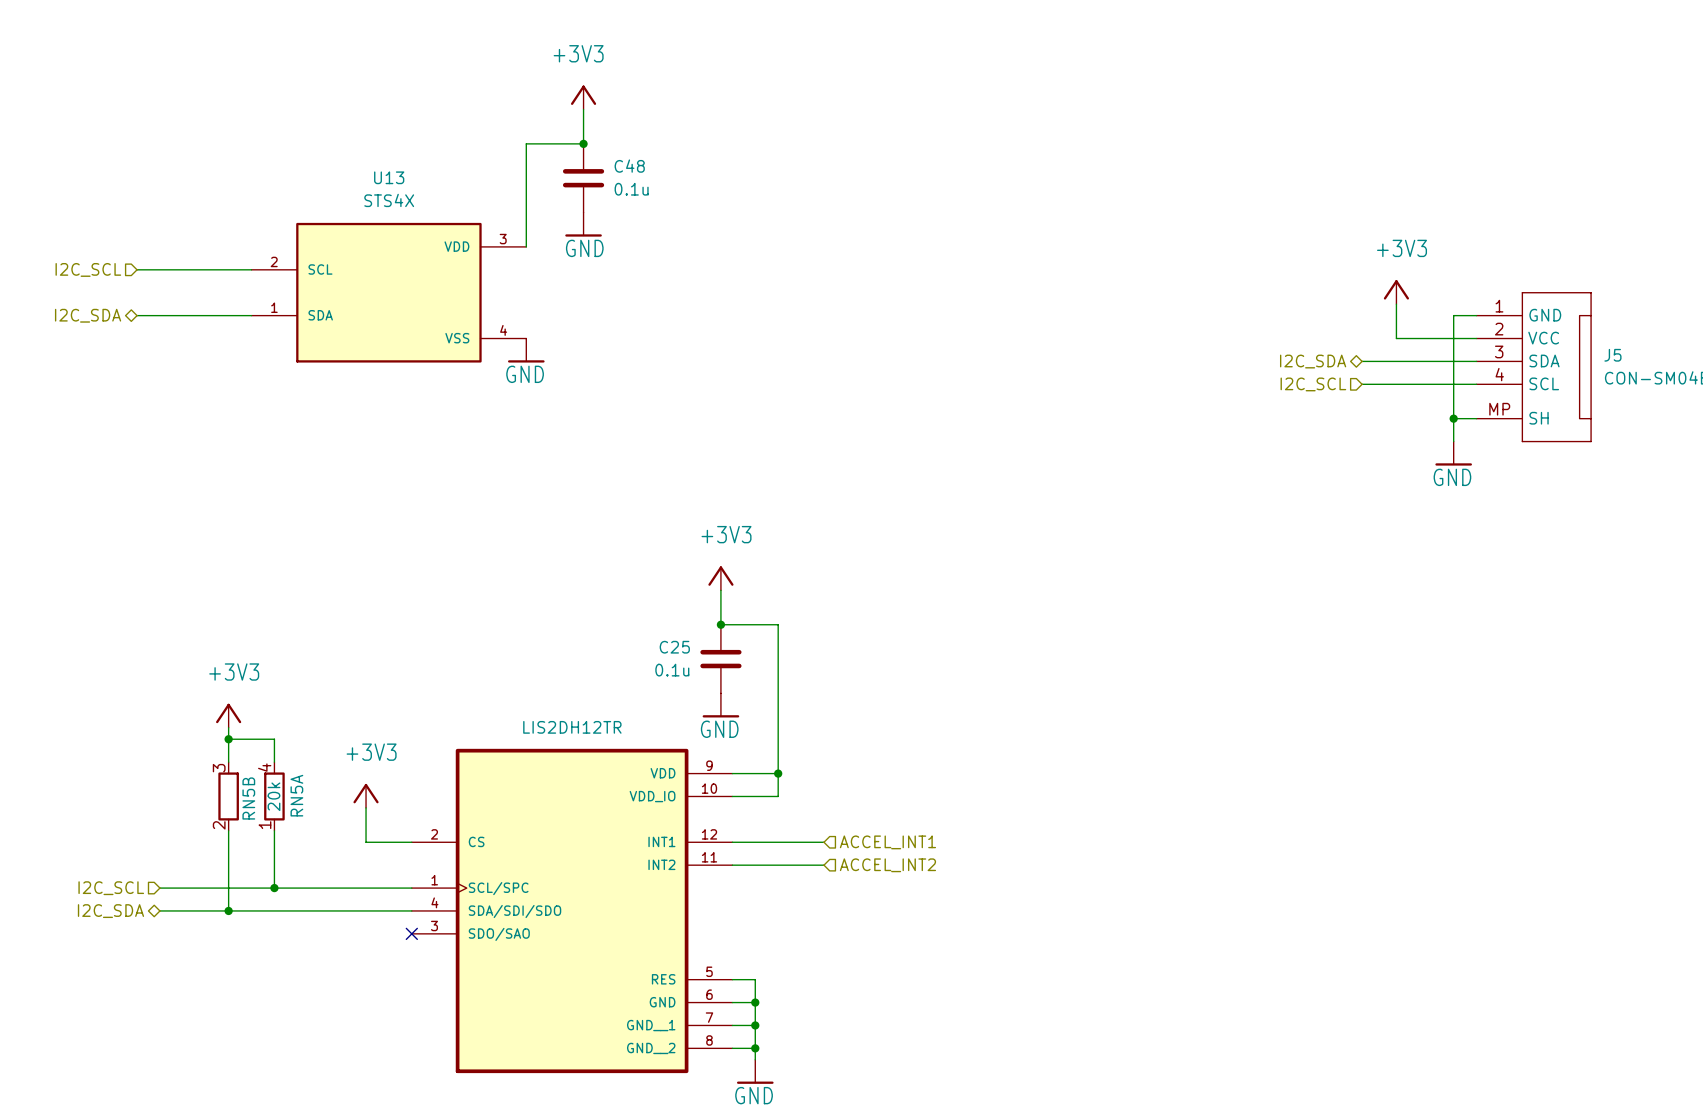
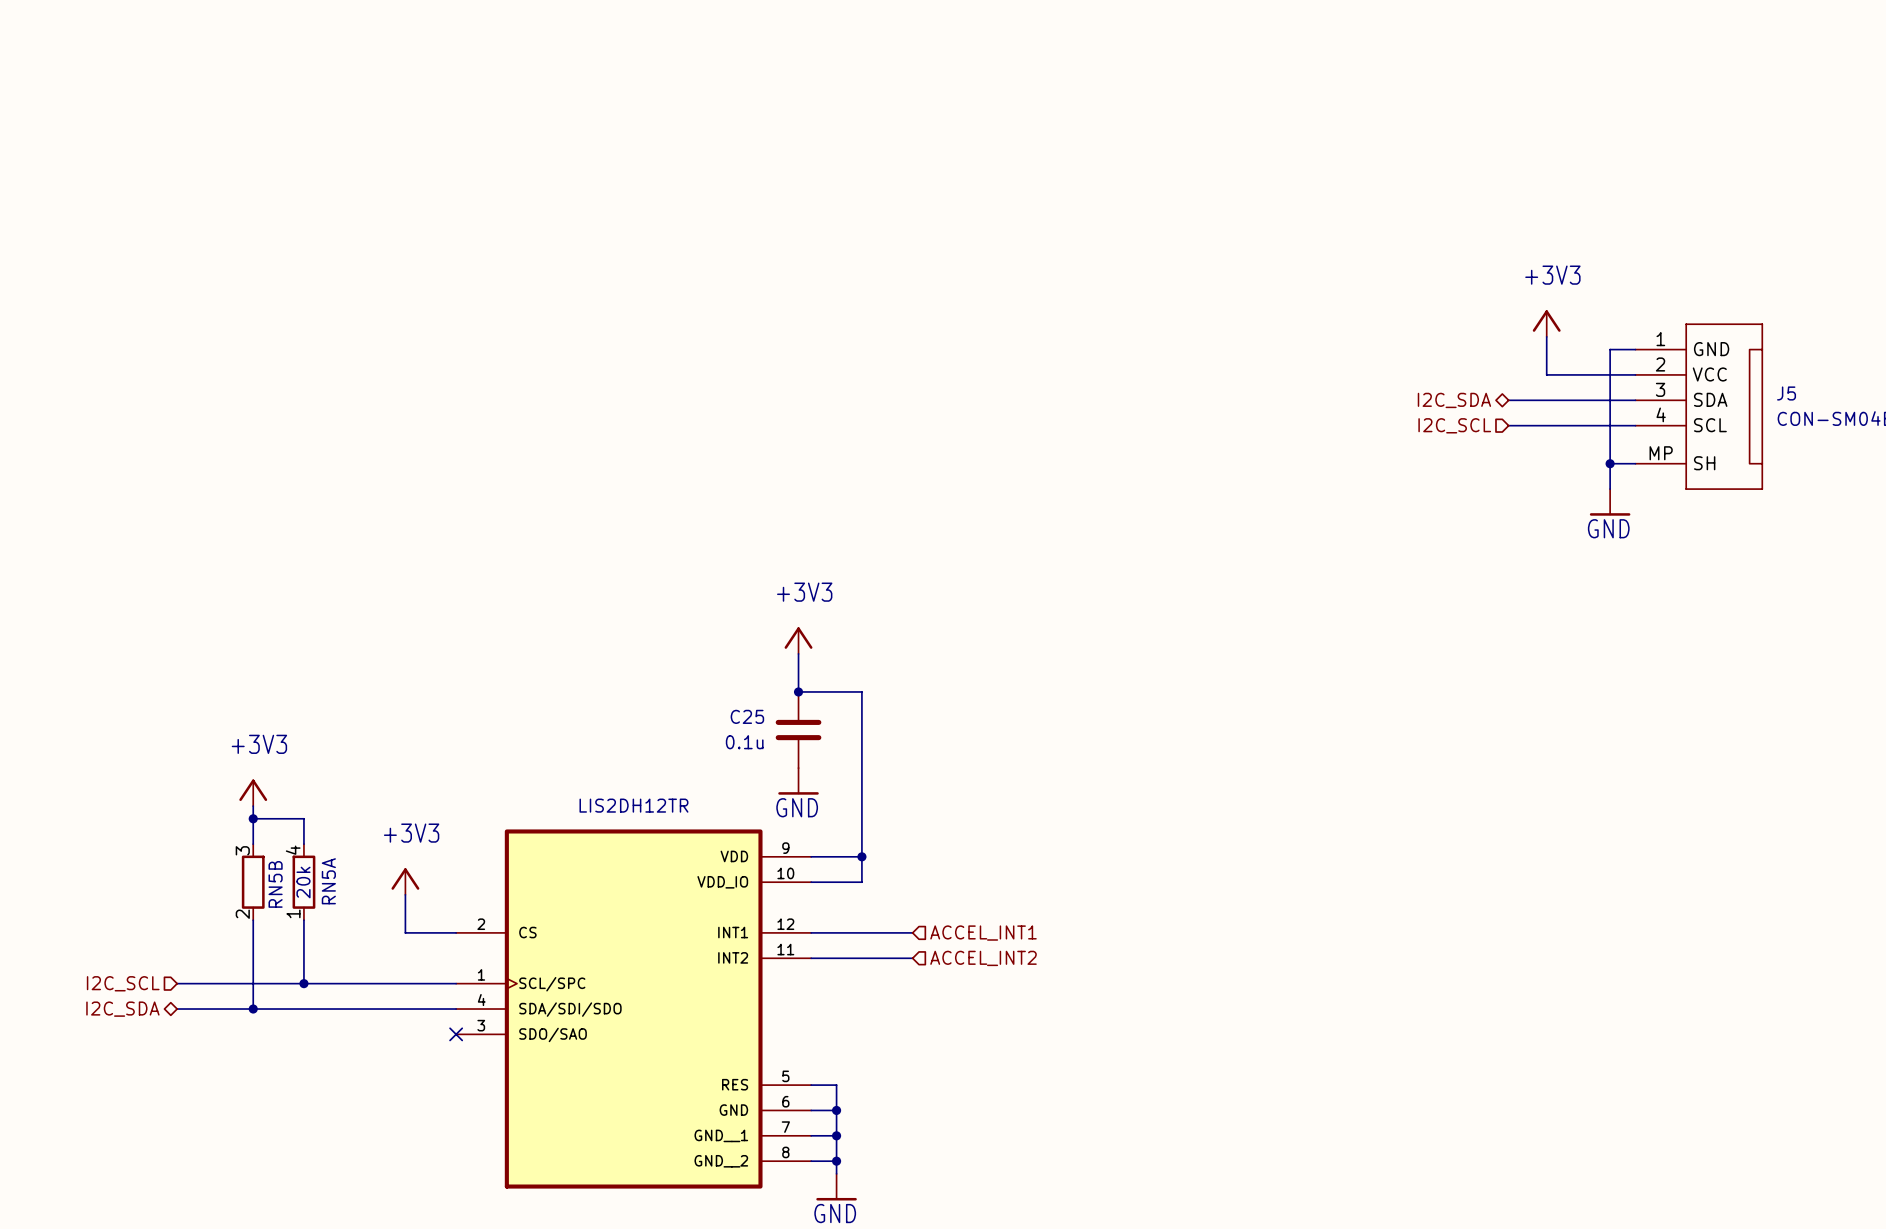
power symbol: +3V3 (583, 97) -> none
wire: (583, 109) (583, 143) (526, 143) (526, 246) -> none
junction: (583, 143) -> none
C48: 0.1u (583, 178) -> none
power symbol: GND (583, 224) -> none
hierarchical label: I2C_SCL (88, 269) -> none
wire: (137, 269) (251, 269) -> none
U13: STS4X (388, 292) -> none
hierarchical label: I2C_SDA (88, 315) -> none
wire: (137, 315) (251, 315) -> none
power symbol: GND (526, 350) -> none

